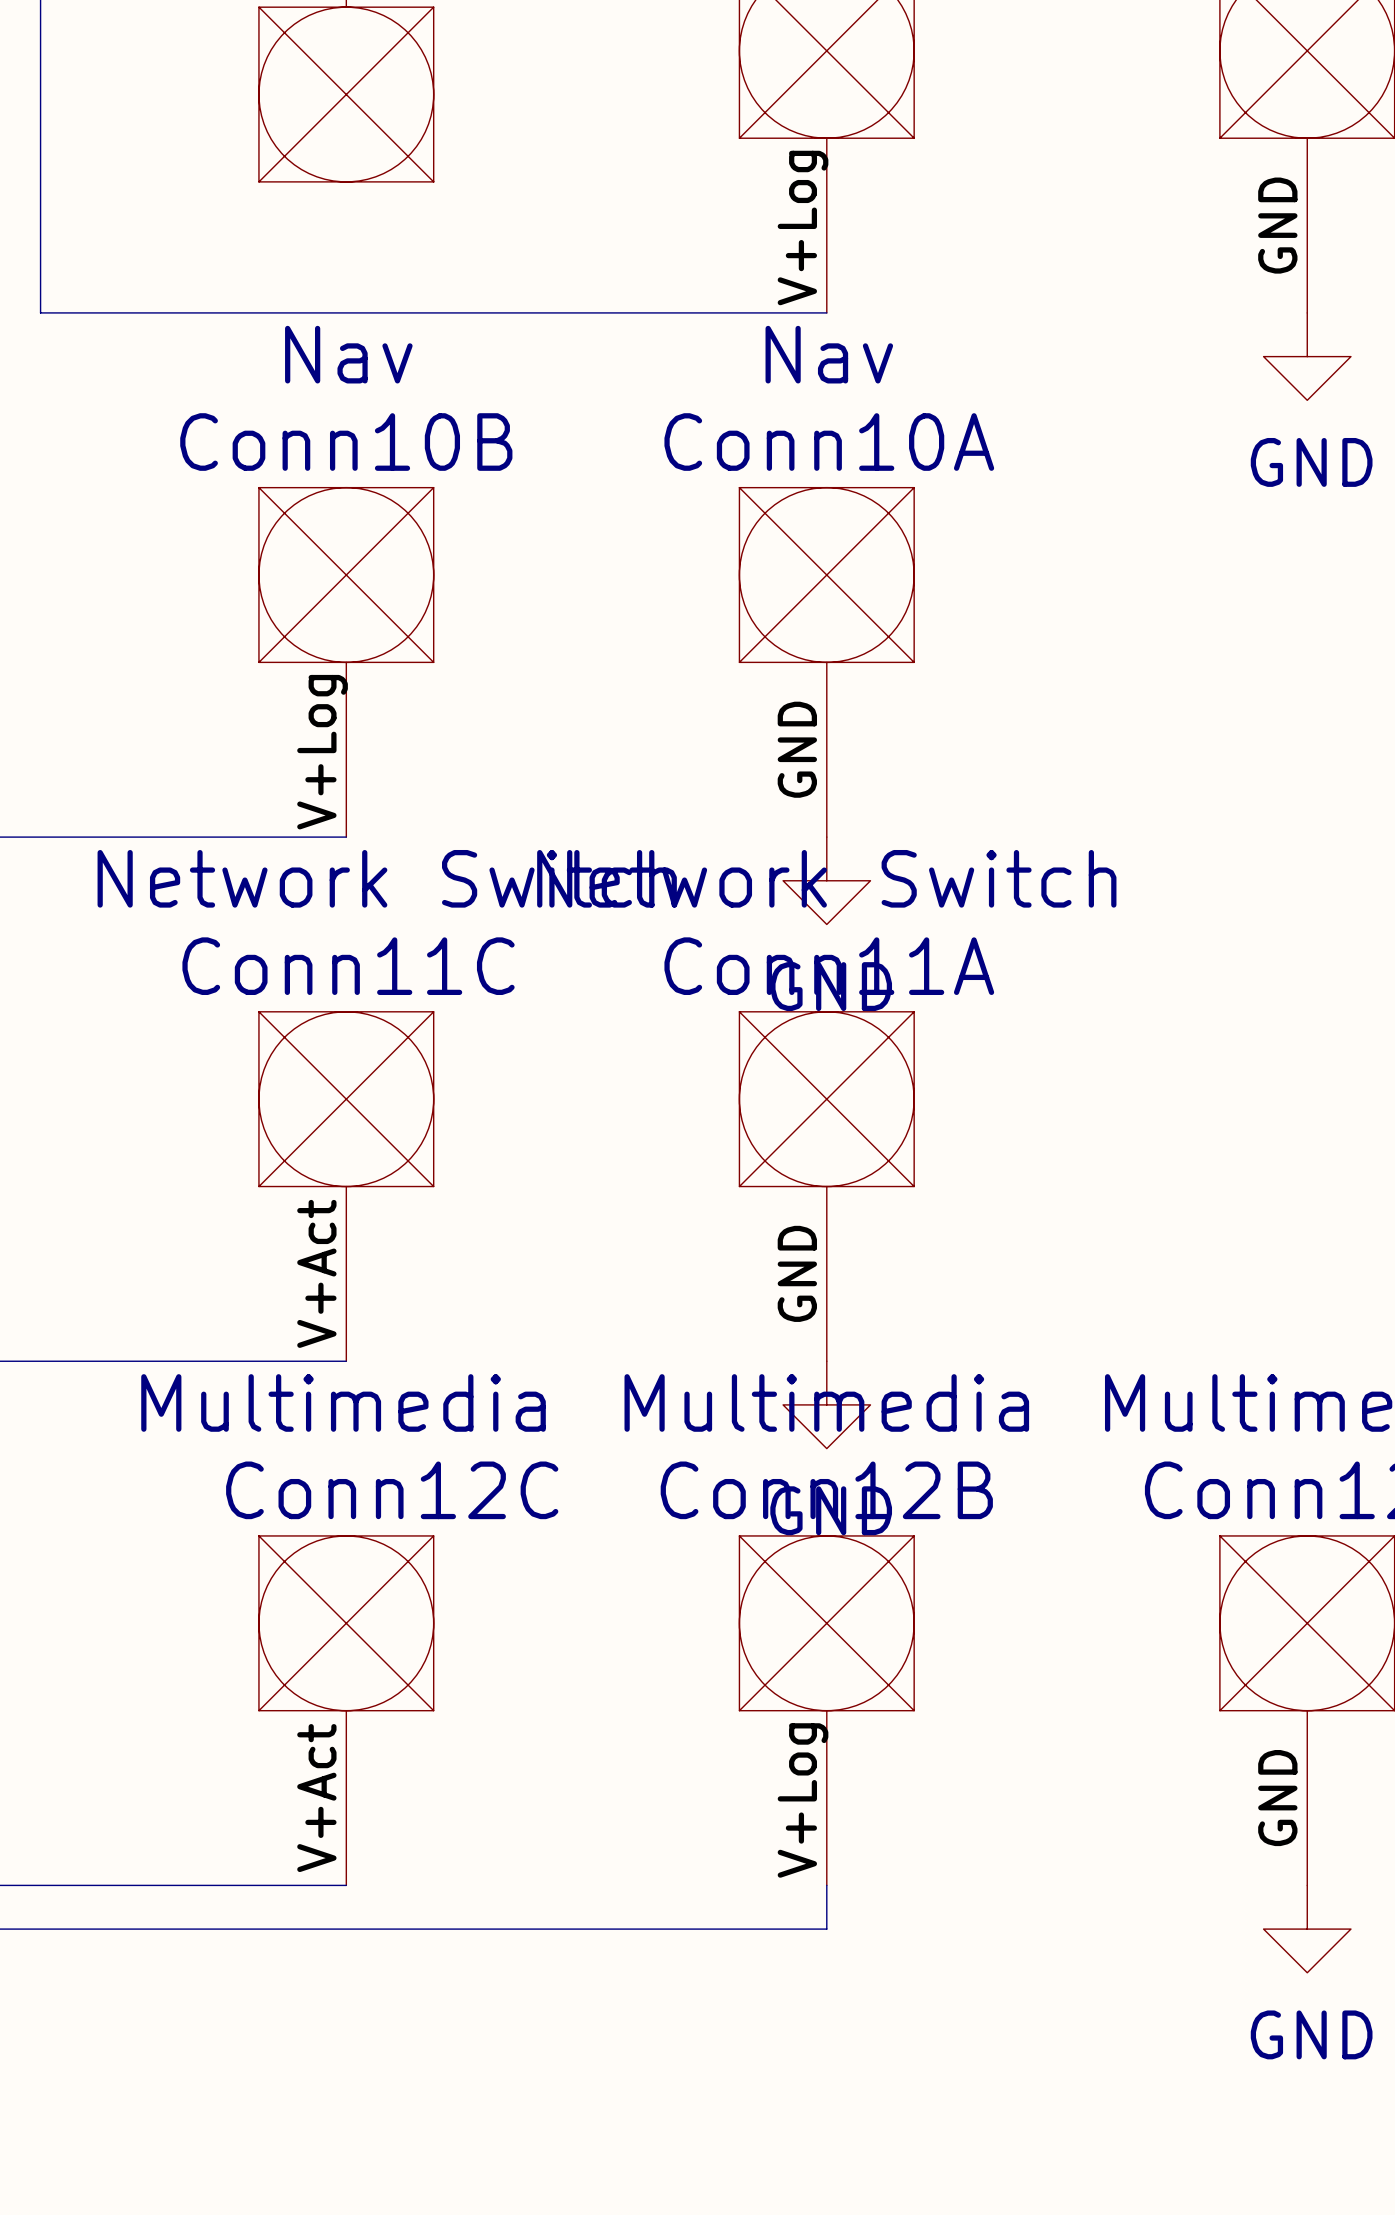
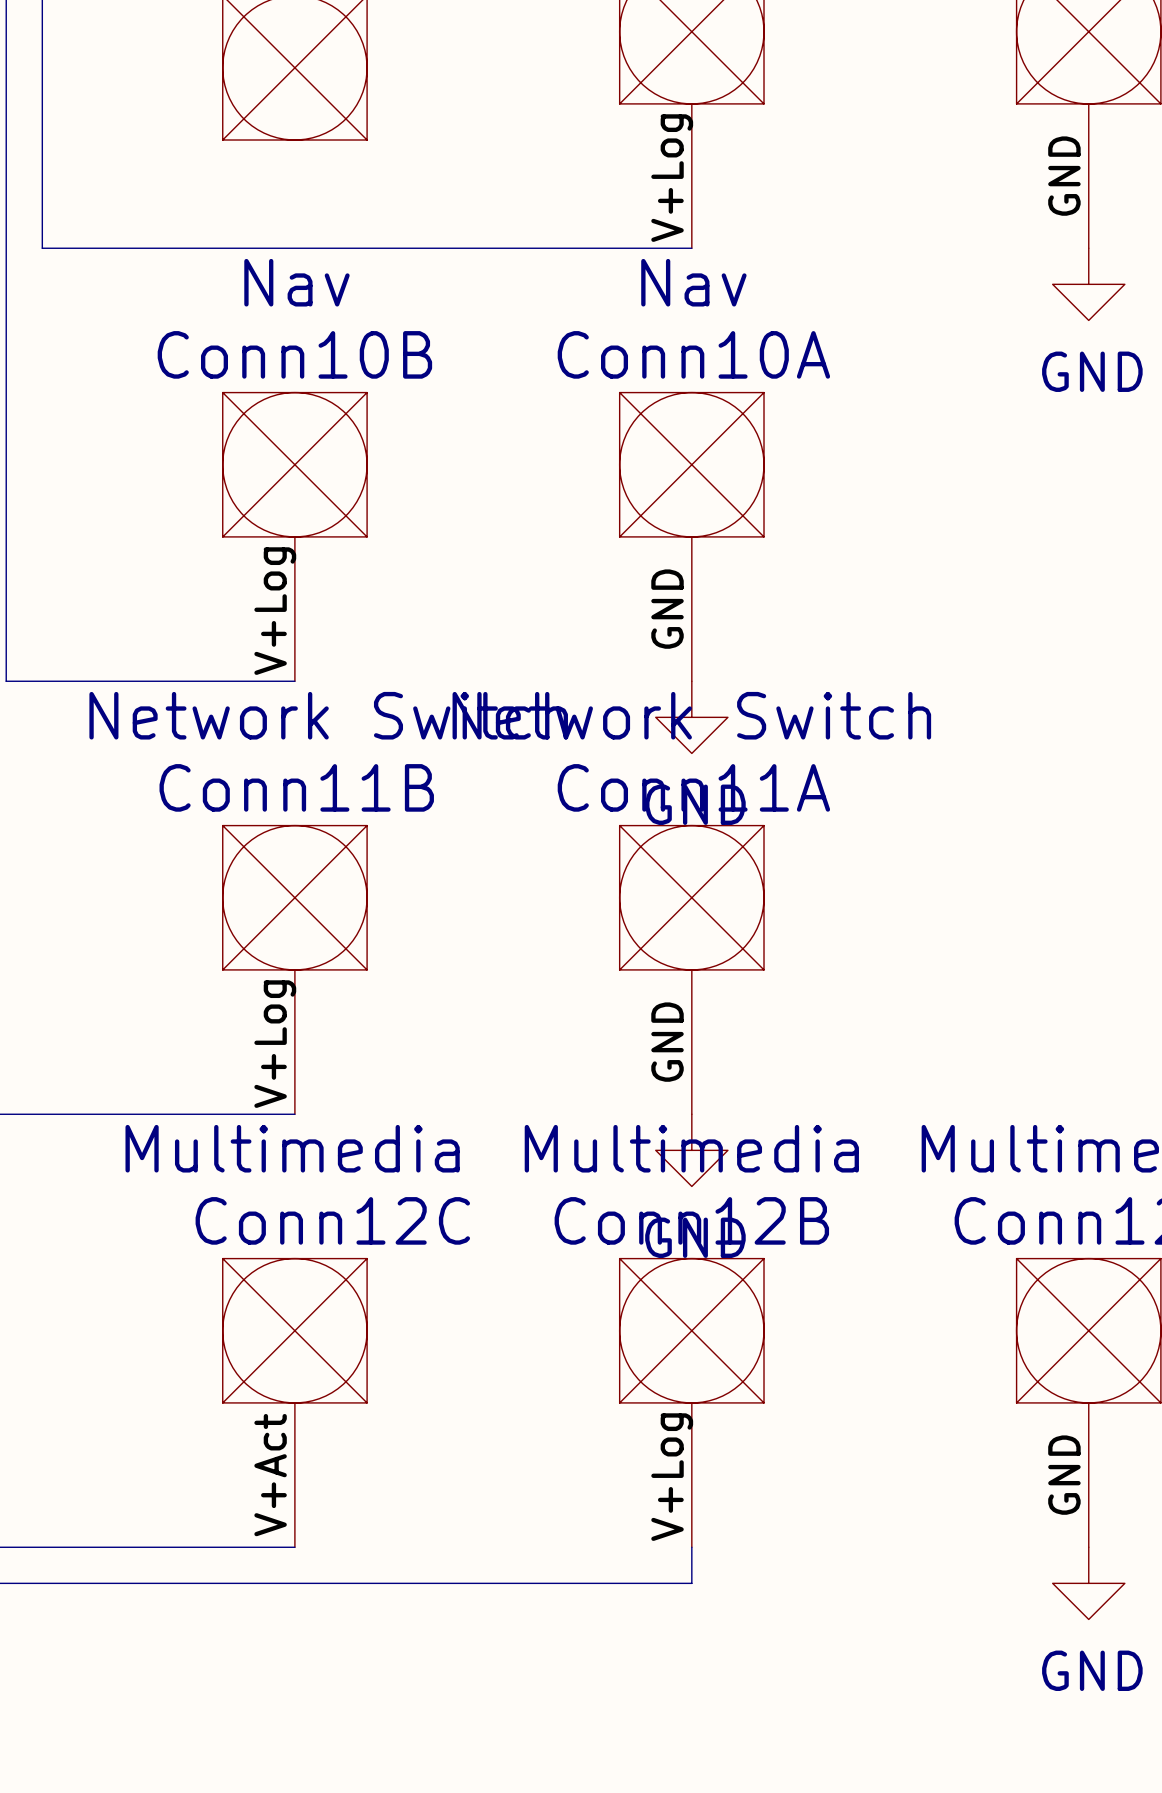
Conn11C name: Conn11C (348, 966) -> Conn11B (296, 787)
Conn11C pin name: V+Act (316, 1273) -> V+Log (275, 1044)

